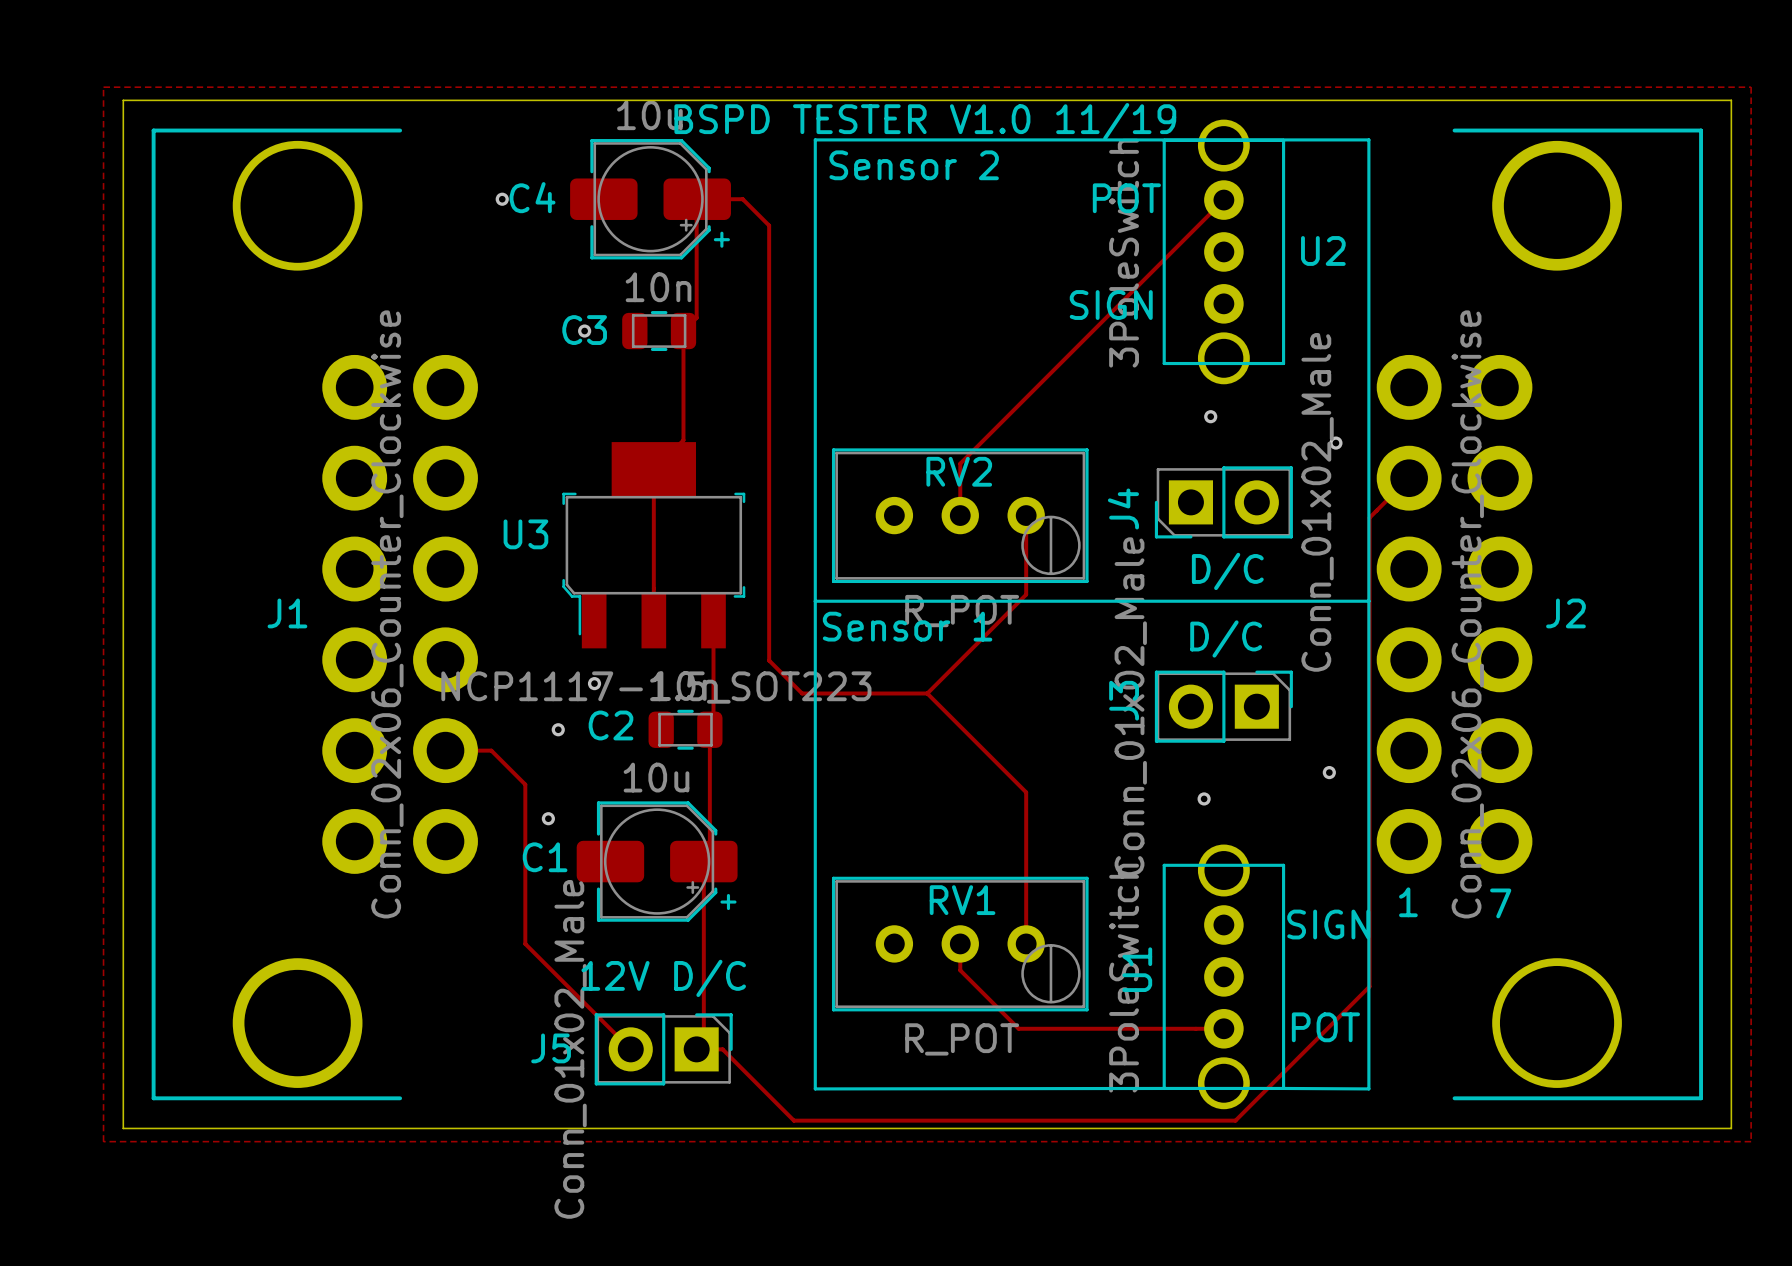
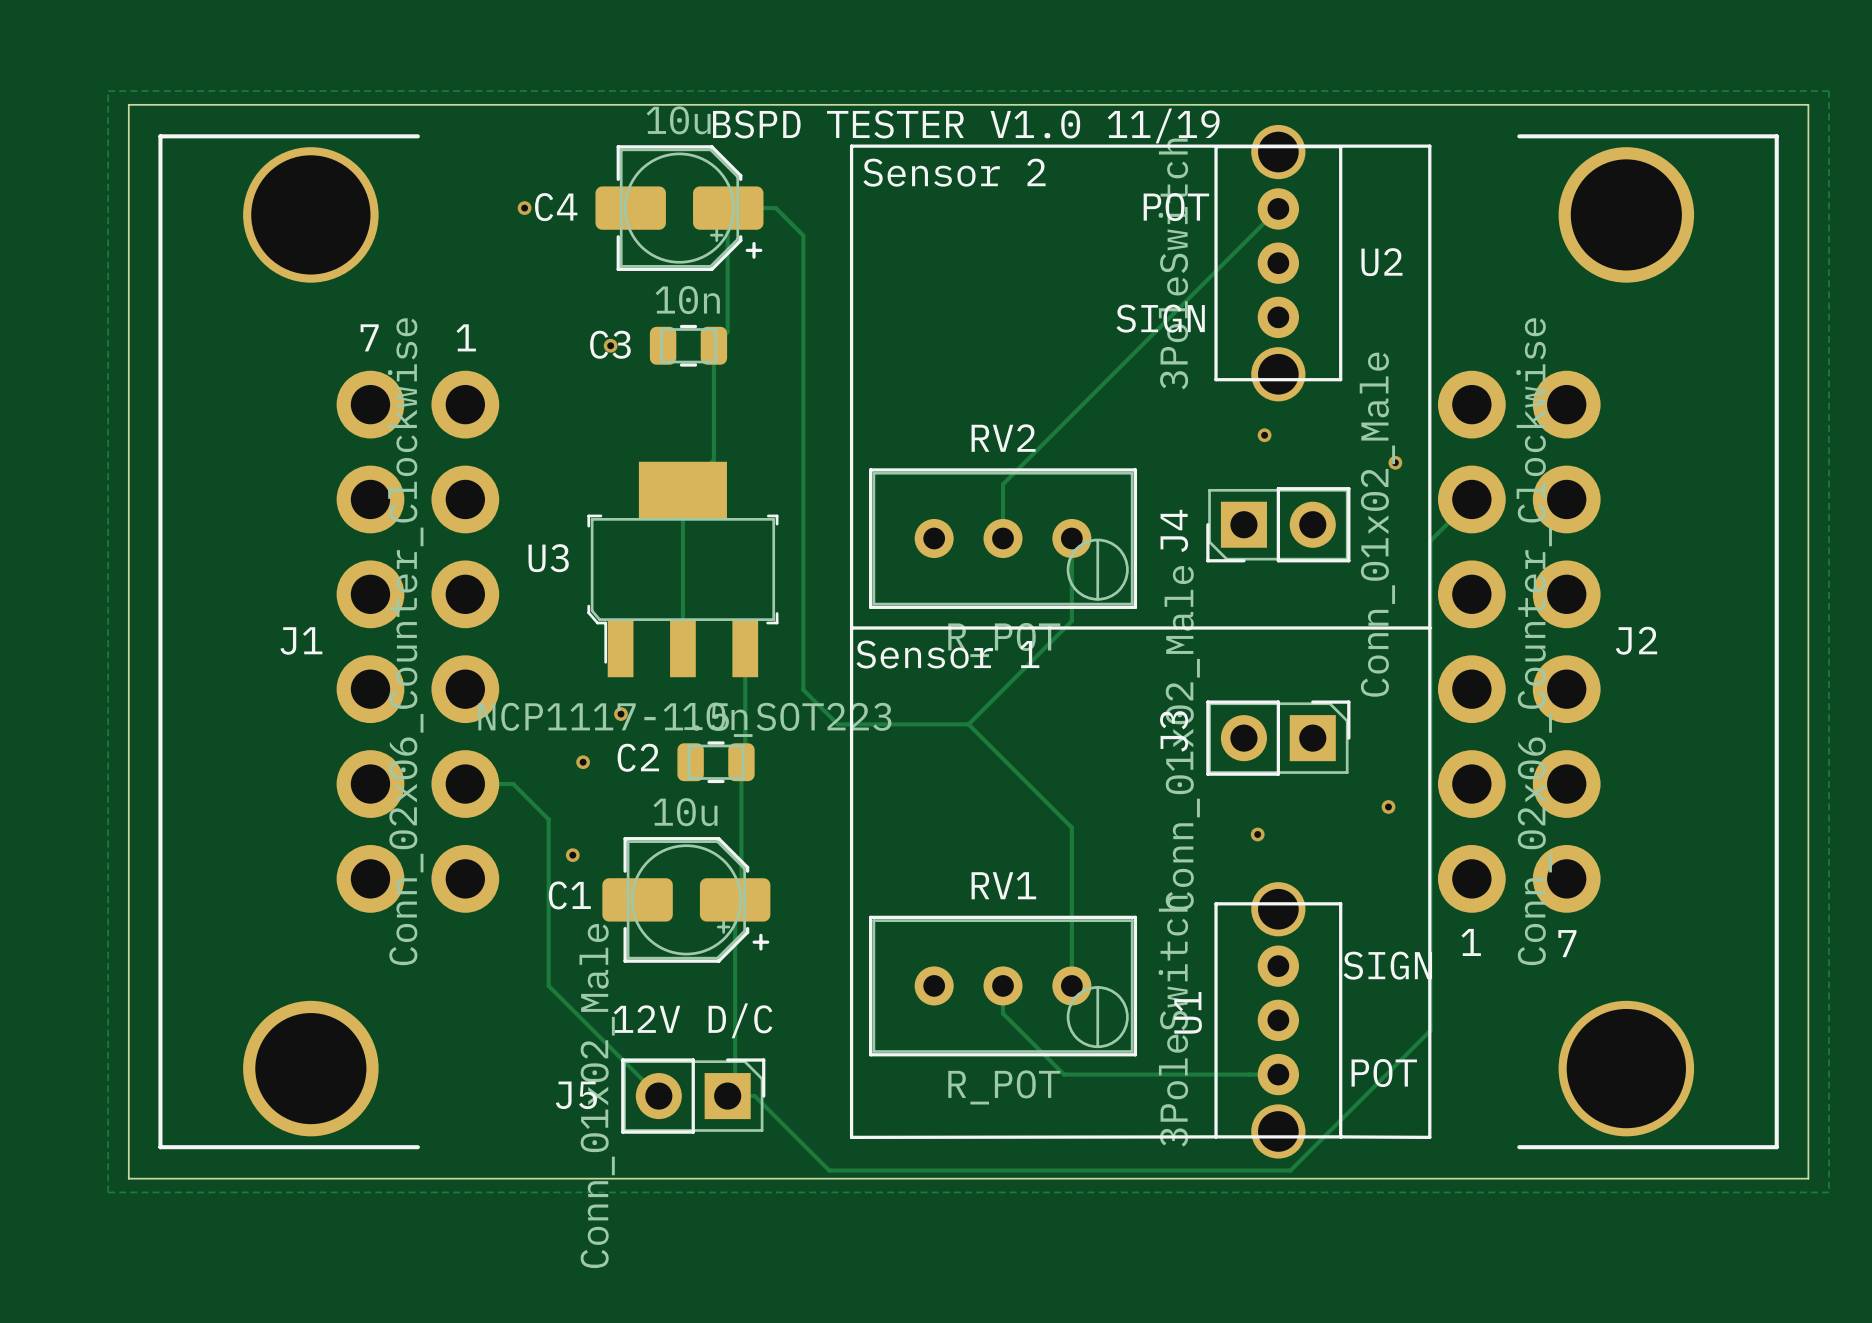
text: none -> 7 (369, 337)
text: none -> 1 (466, 337)
RV2 name position: RV2 (959, 471) -> RV2 (1003, 438)
text: D/C (1227, 571) -> none
text: D/C (1226, 638) -> none
RV1 name position: RV1 (962, 900) -> RV1 (1003, 885)

